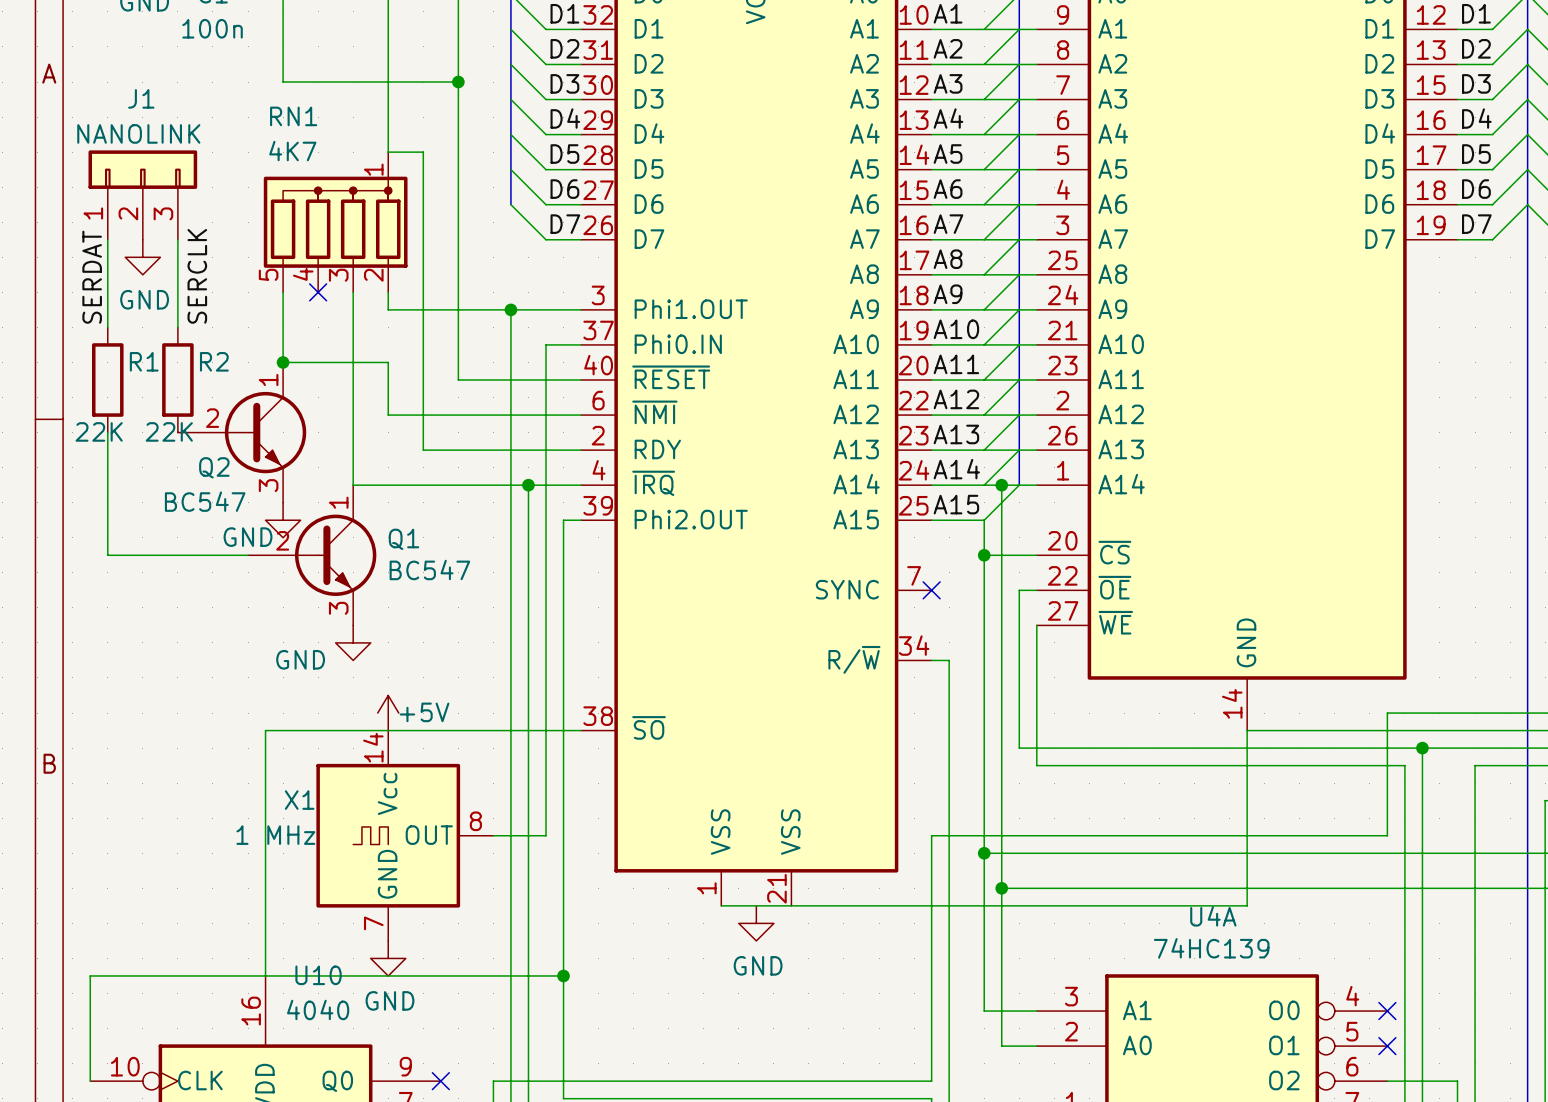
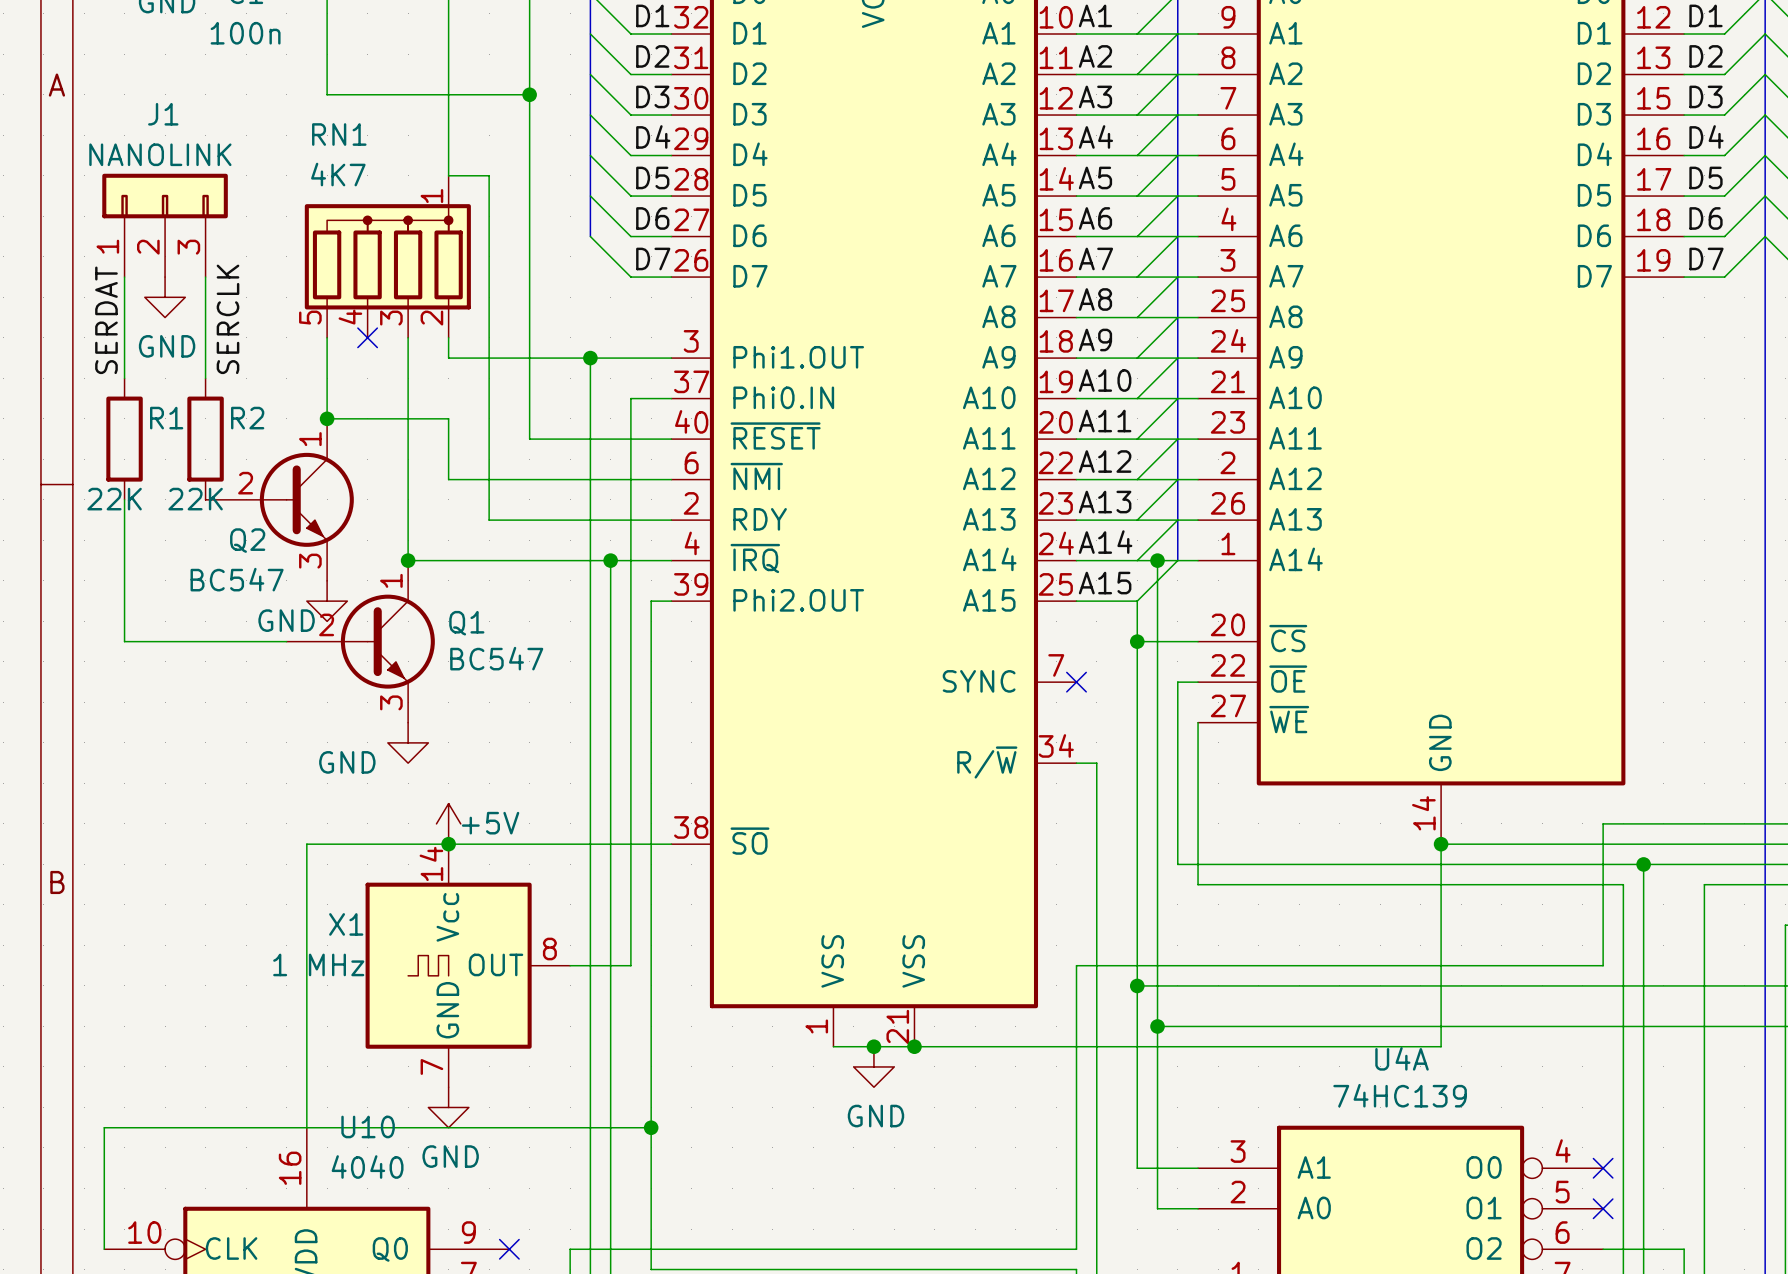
junction: none -> (408, 560)
junction: none -> (448, 844)
junction: none -> (1441, 844)
junction: none -> (873, 1046)
junction: none -> (914, 1046)

